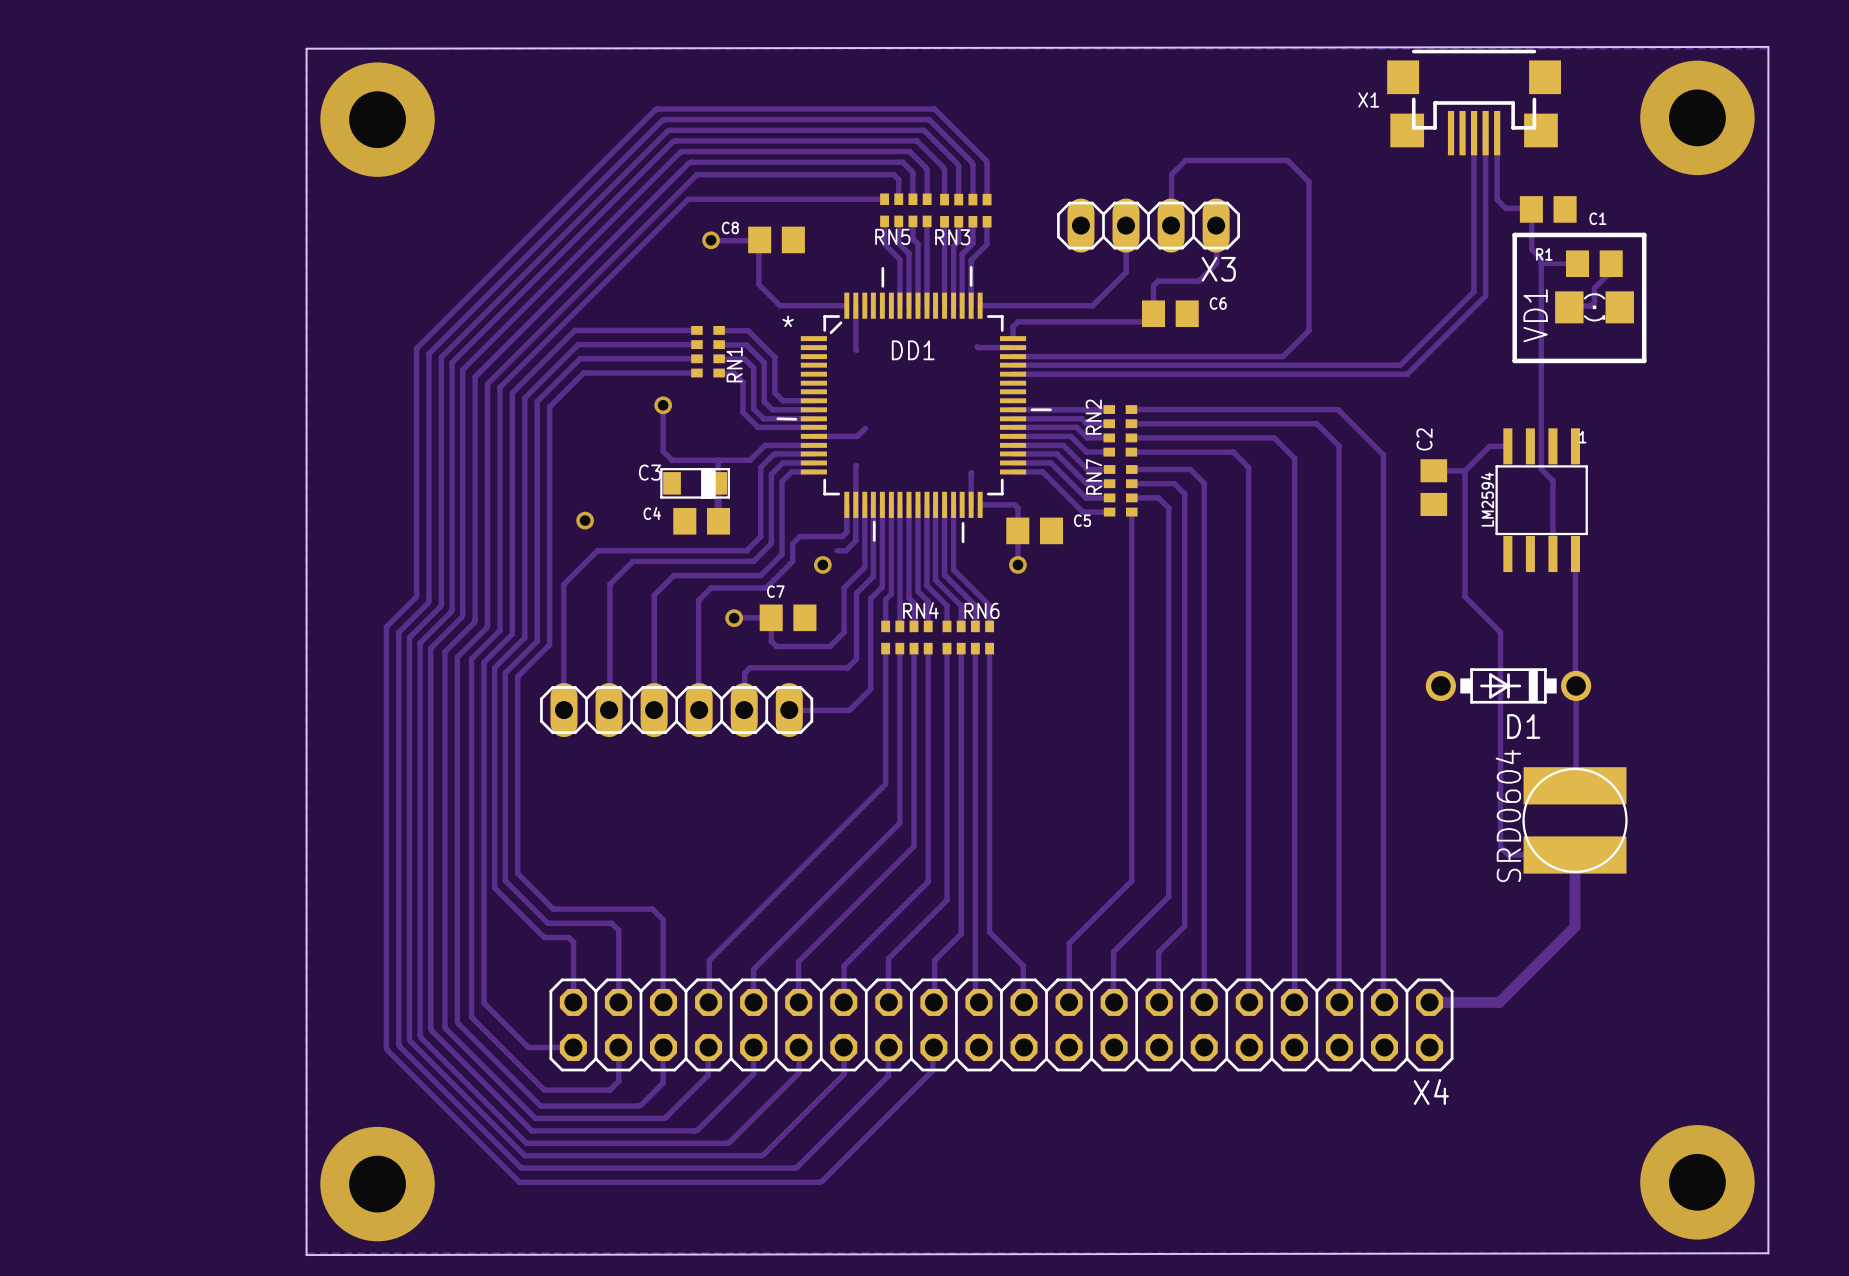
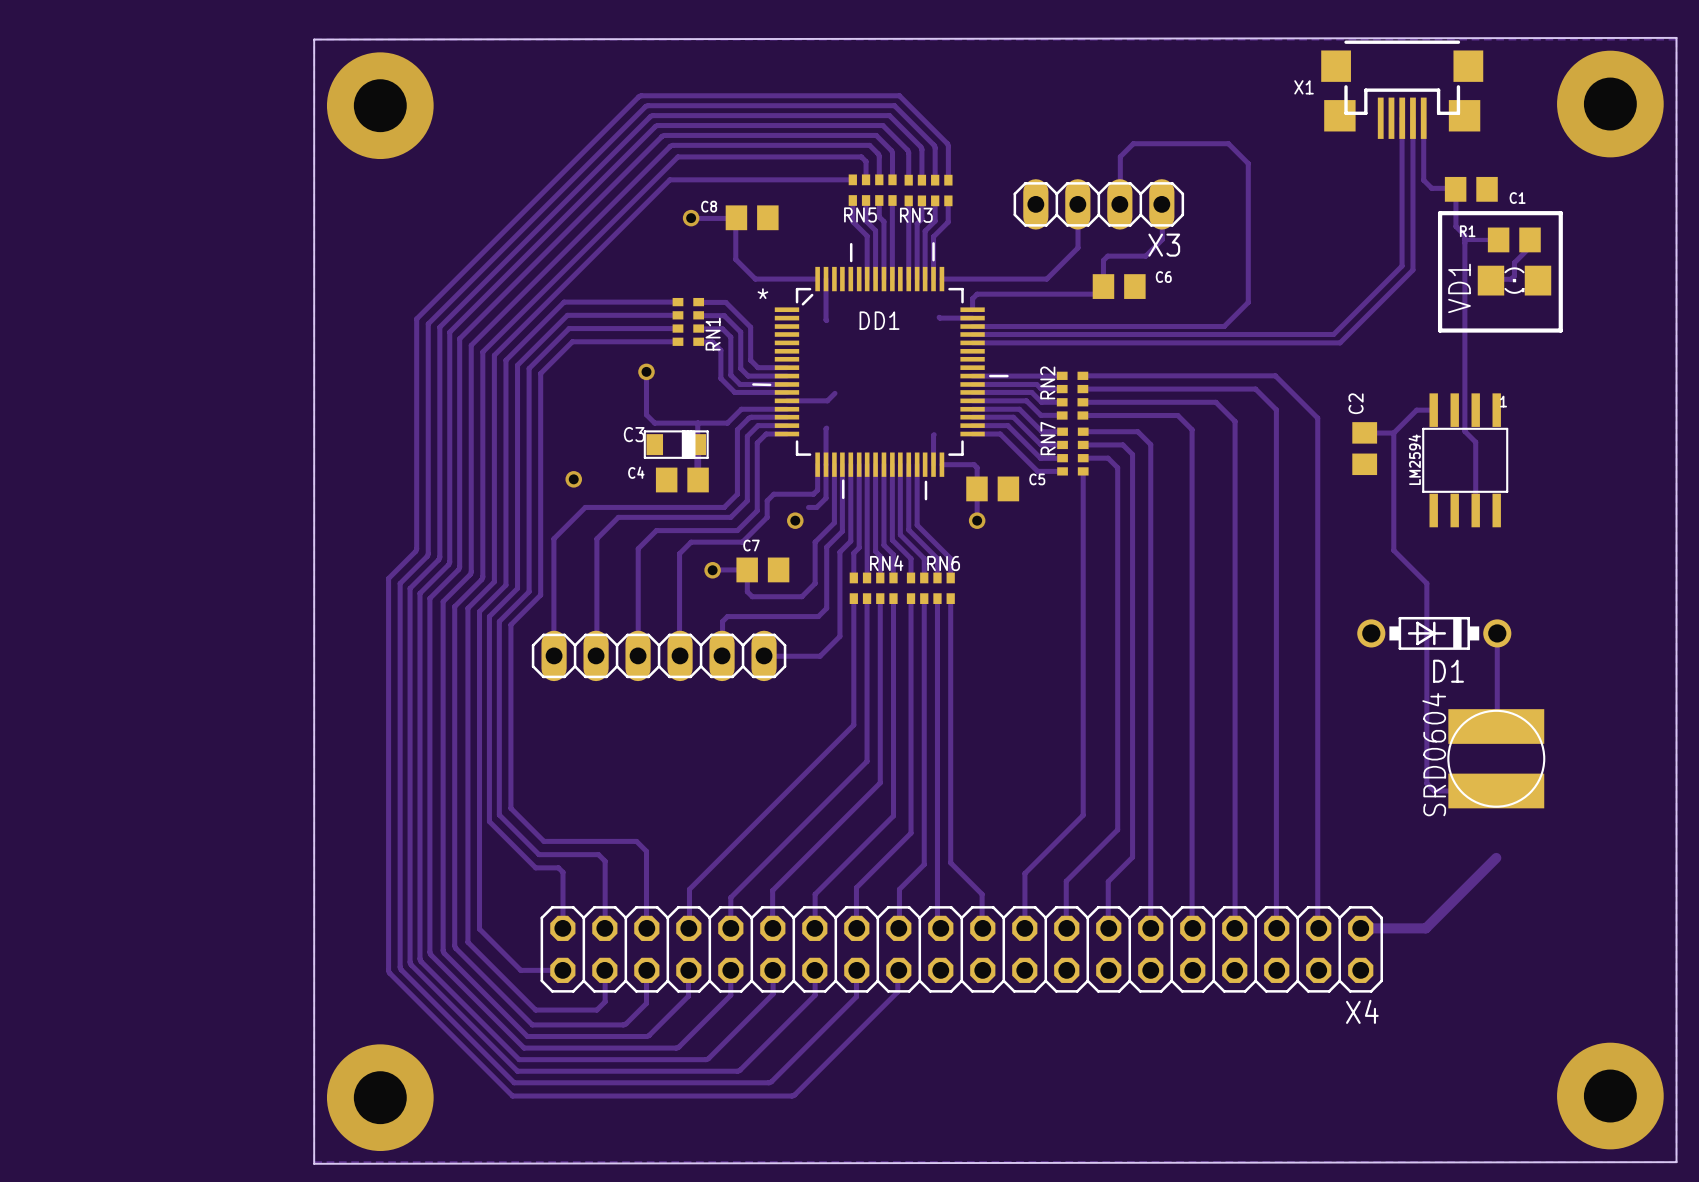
track: (1575, 554) (1575, 685) -> none
track: (1575, 855) (1575, 926) -> none

